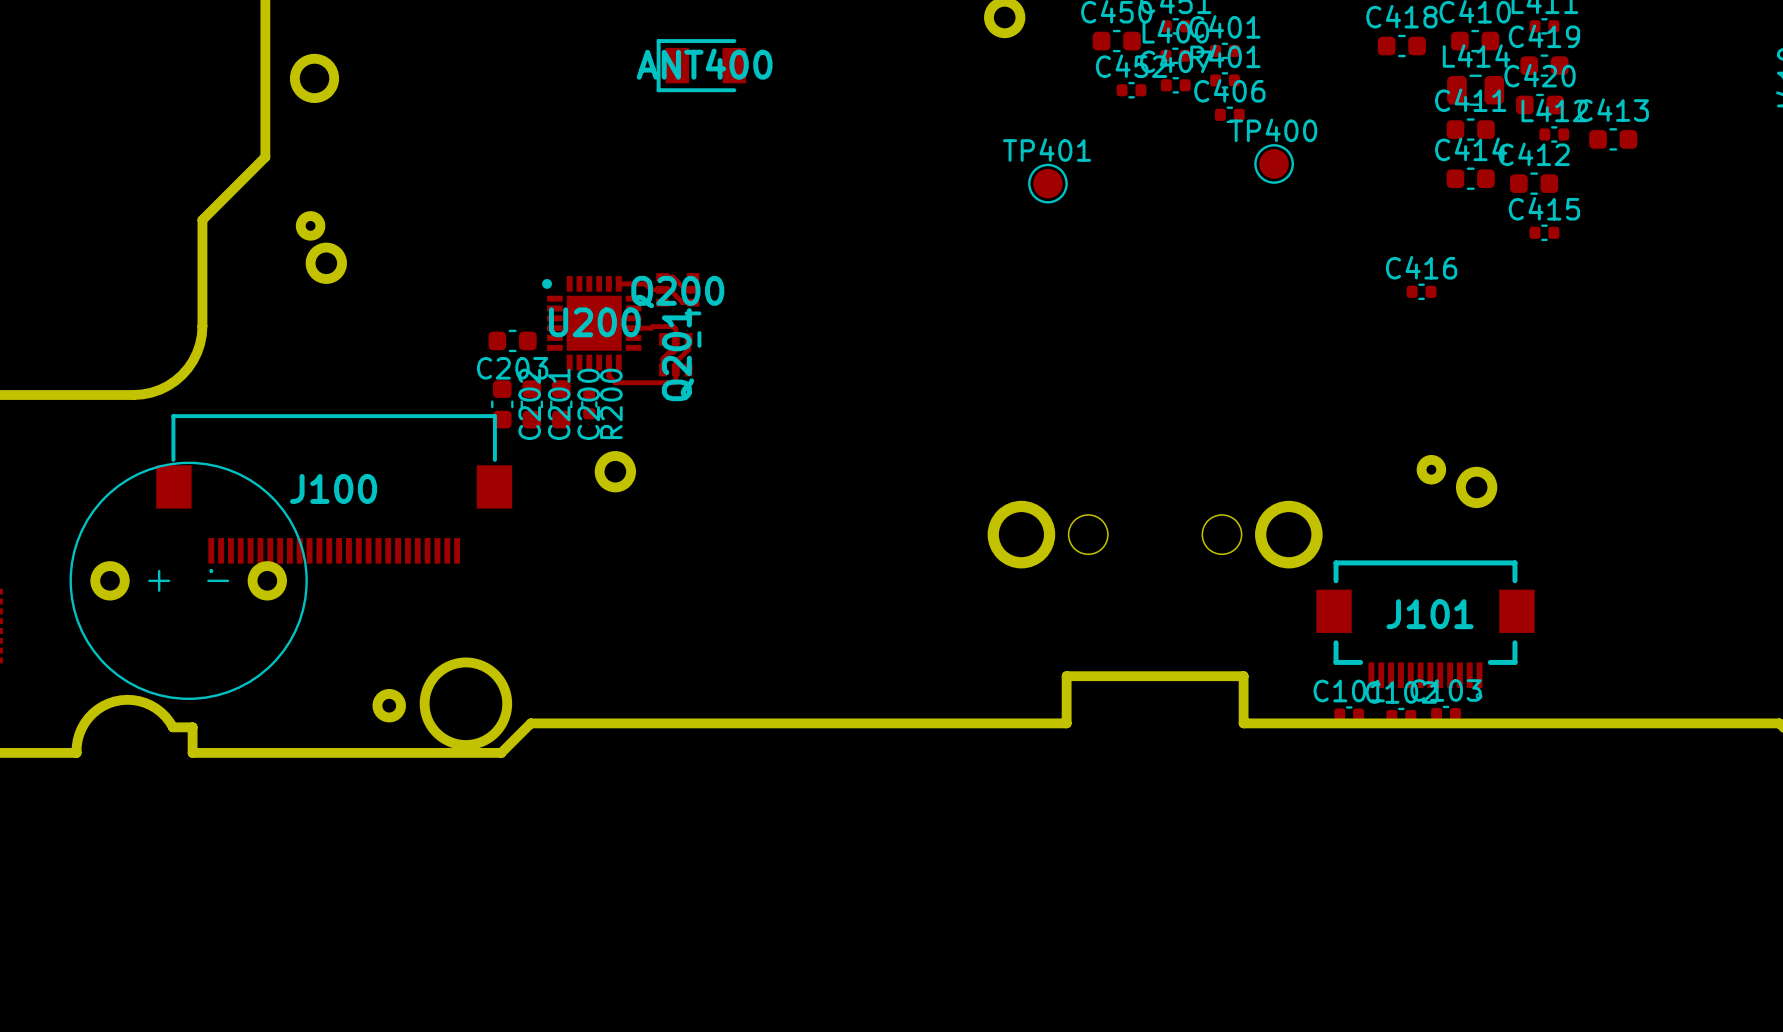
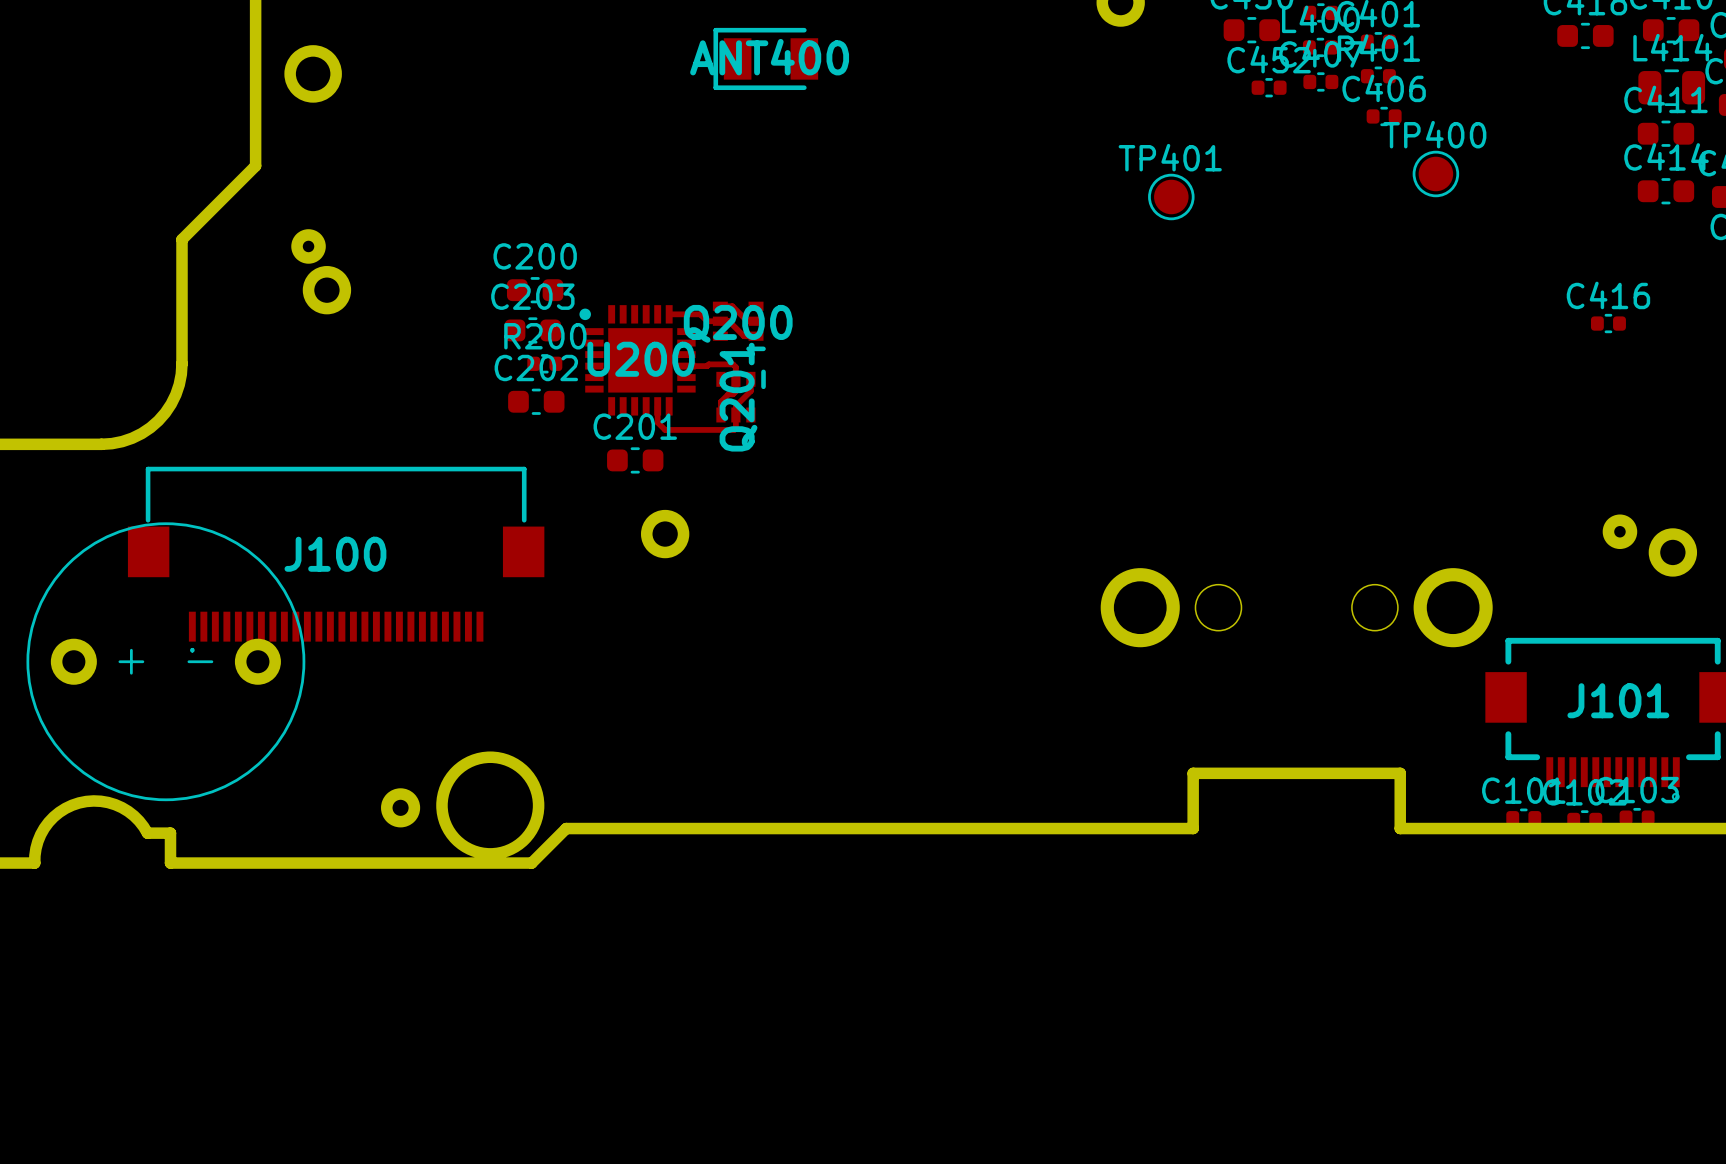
C203 position: (512, 340) -> (532, 330)
C203 name position: C203 (512, 368) -> C203 (532, 296)
C202 rotation: 0° (502, 404) -> 90° clockwise (536, 401)
C202 position: (502, 404) -> (536, 401)
C202 name position: C202 (529, 404) -> C202 (536, 368)
C201 rotation: 0° (531, 404) -> 90° clockwise (635, 460)
C201 position: (531, 404) -> (635, 460)
C201 name position: C201 (559, 404) -> C201 (635, 426)
C200 rotation: 0° (561, 404) -> 90° clockwise (535, 290)
C200 position: (561, 404) -> (535, 290)
C200 name position: C200 (588, 404) -> C200 (535, 256)
R200 rotation: 0° (589, 404) -> 90° clockwise (544, 363)
R200 position: (589, 404) -> (544, 363)

